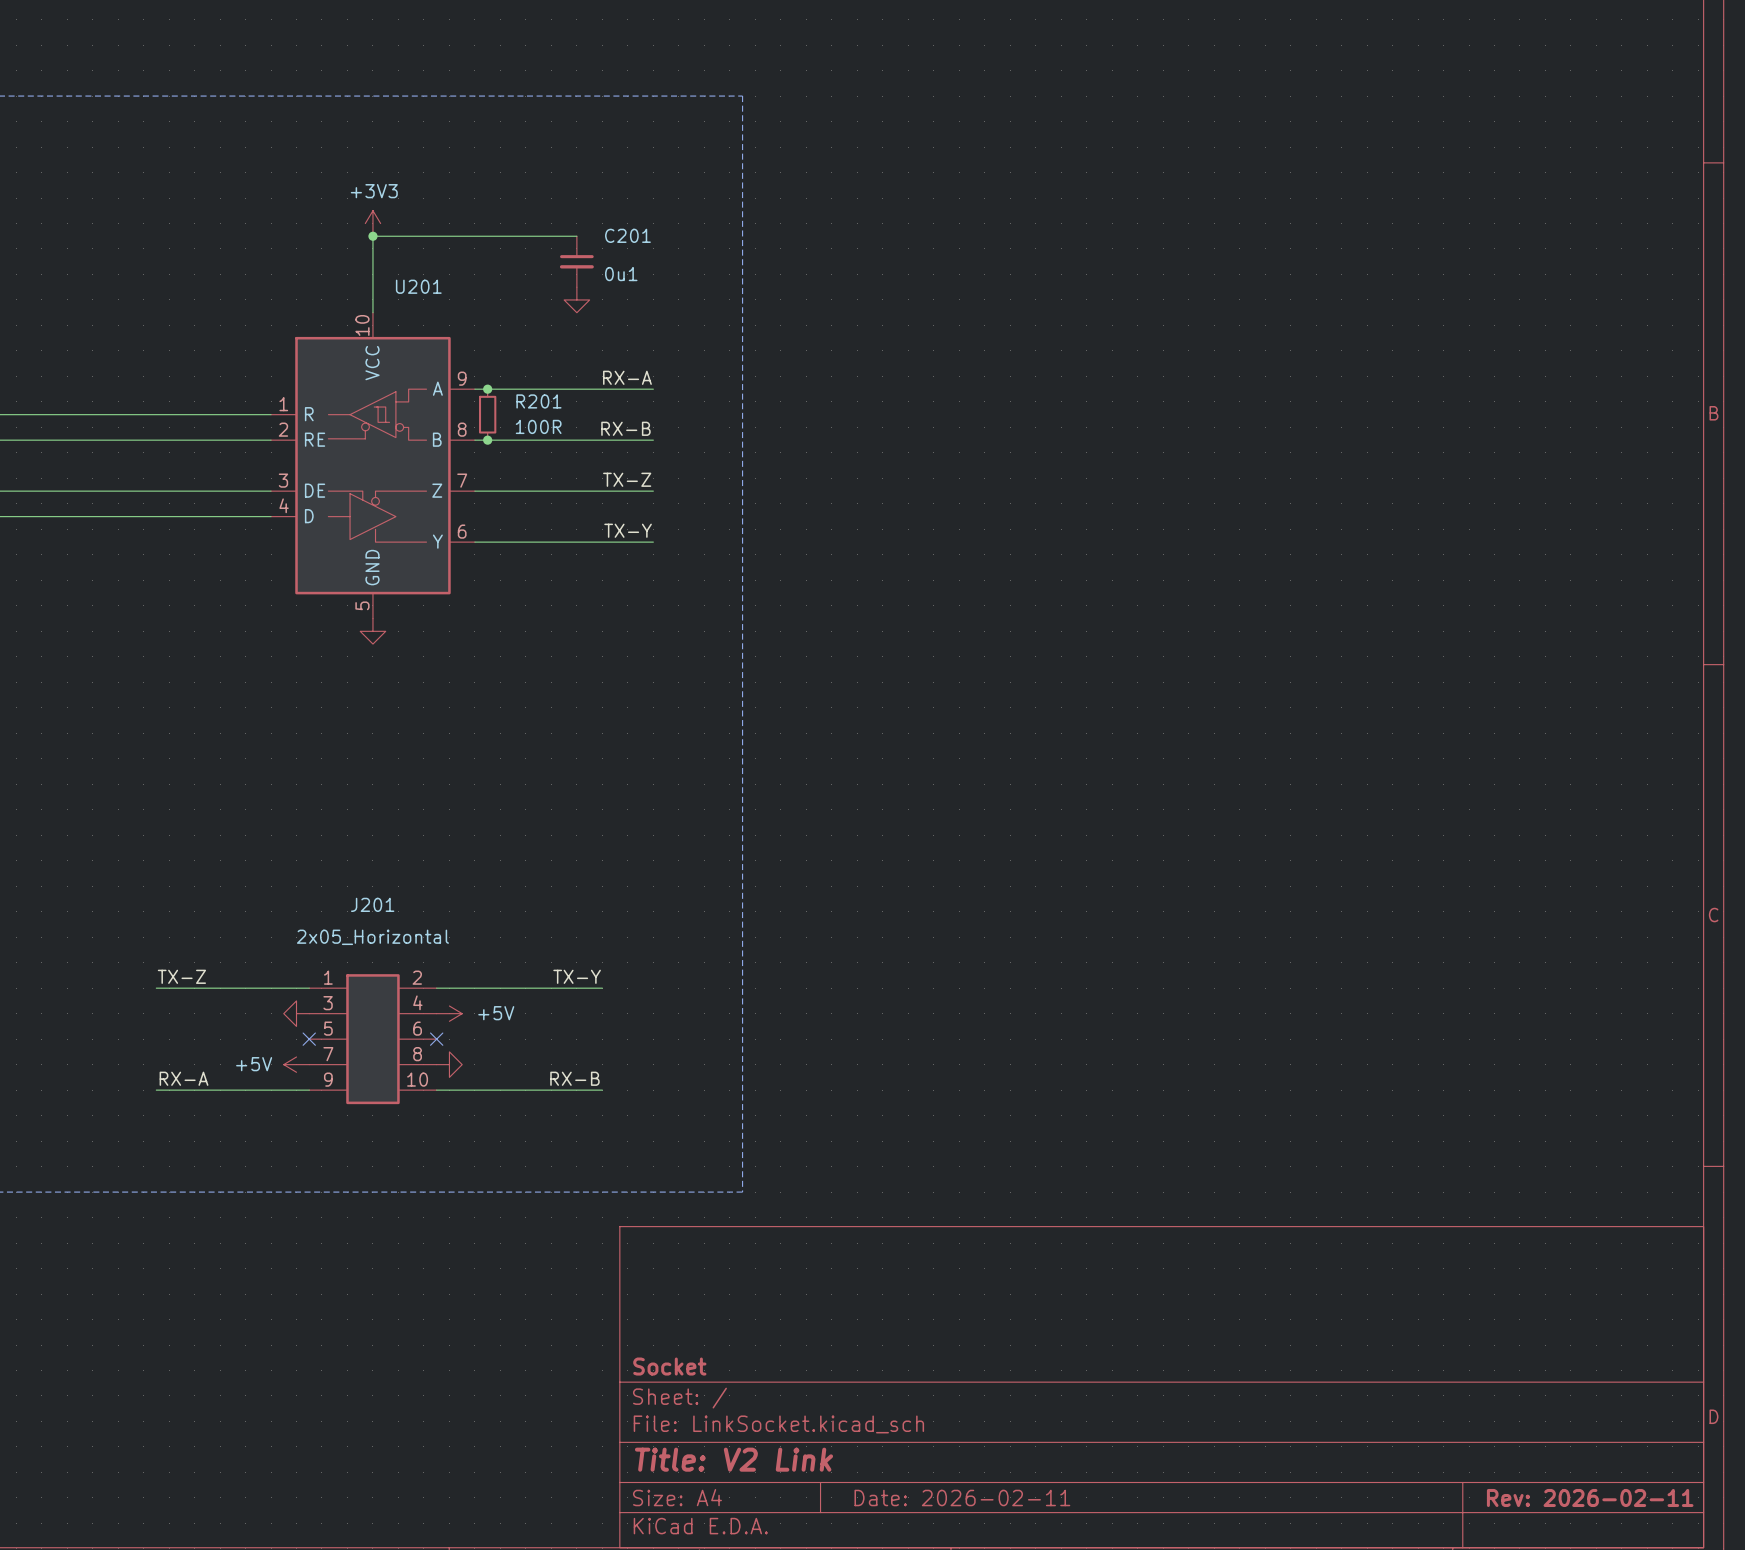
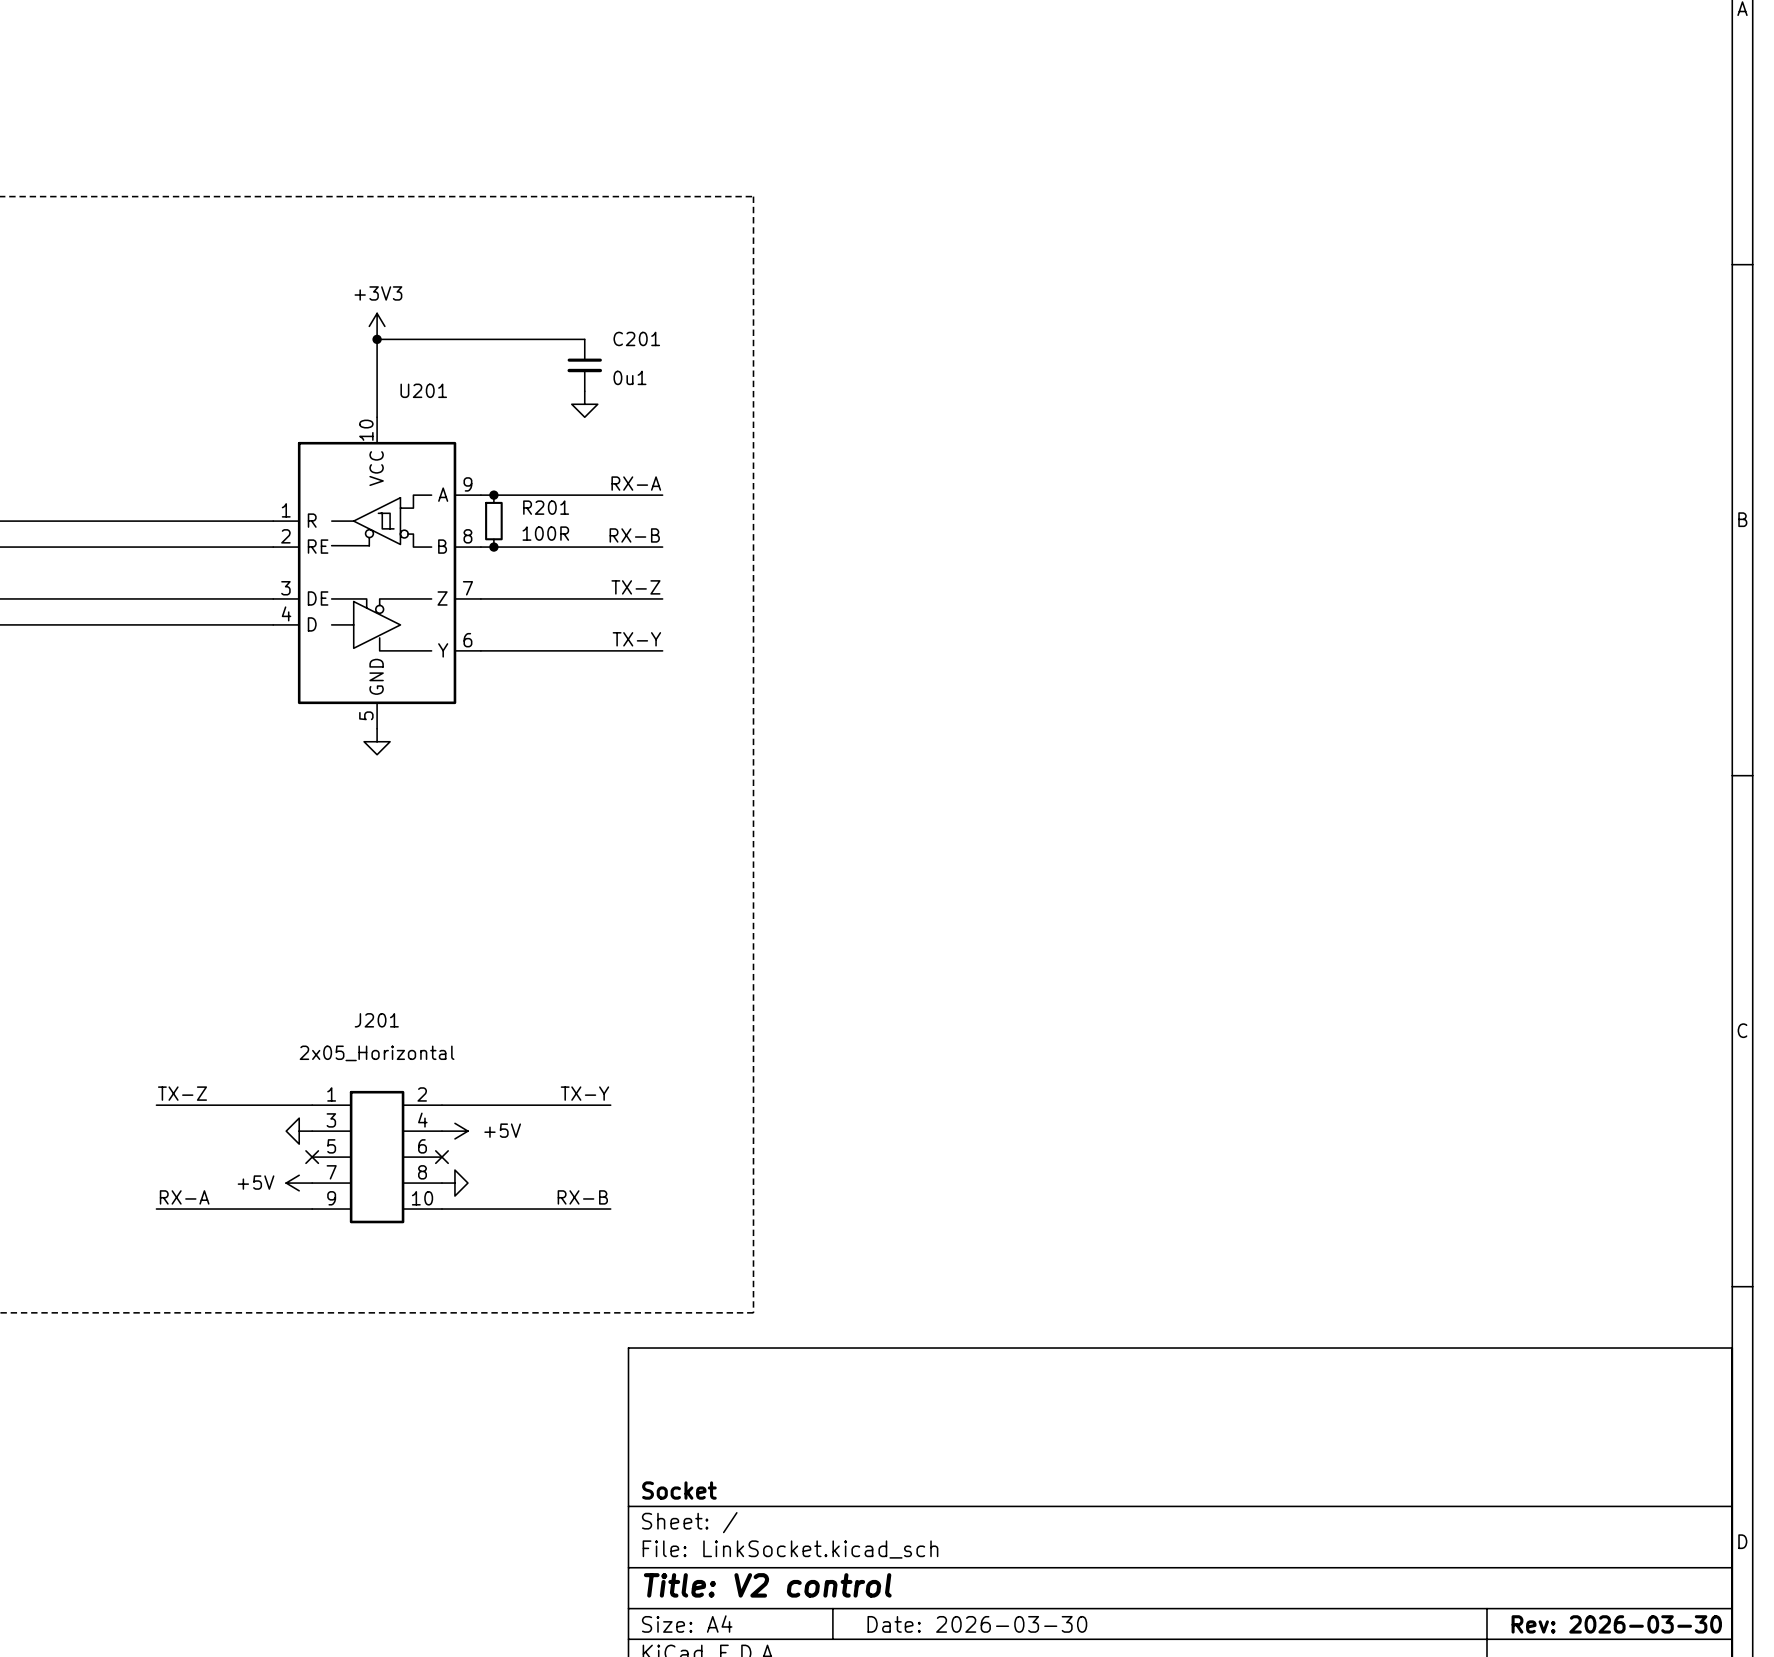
title block: Title: V2 Link (733, 1459) -> Title: V2 control (767, 1585)
title block: Date: 2026-02-11 (962, 1497) -> Date: 2026-03-30 (977, 1624)
title block: Rev: 2026-02-11 (1590, 1497) -> Rev: 2026-03-30 (1616, 1624)

